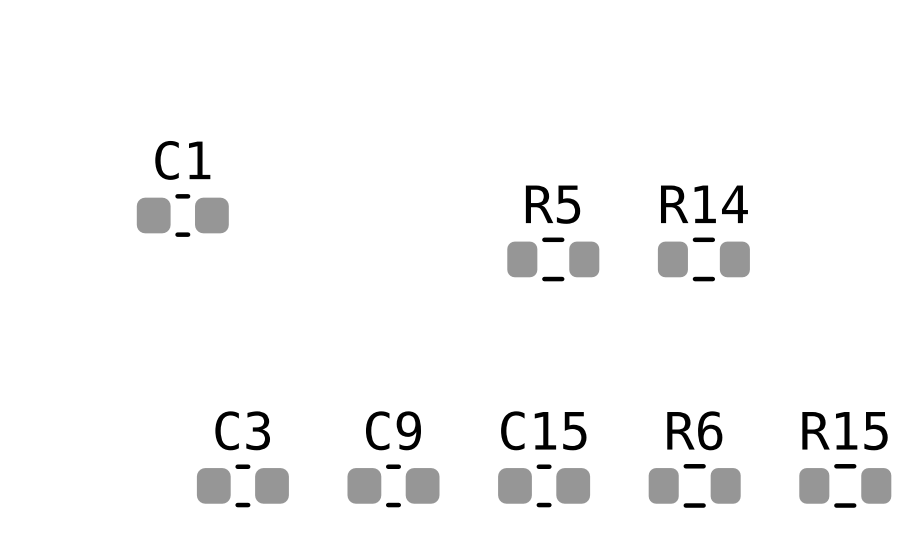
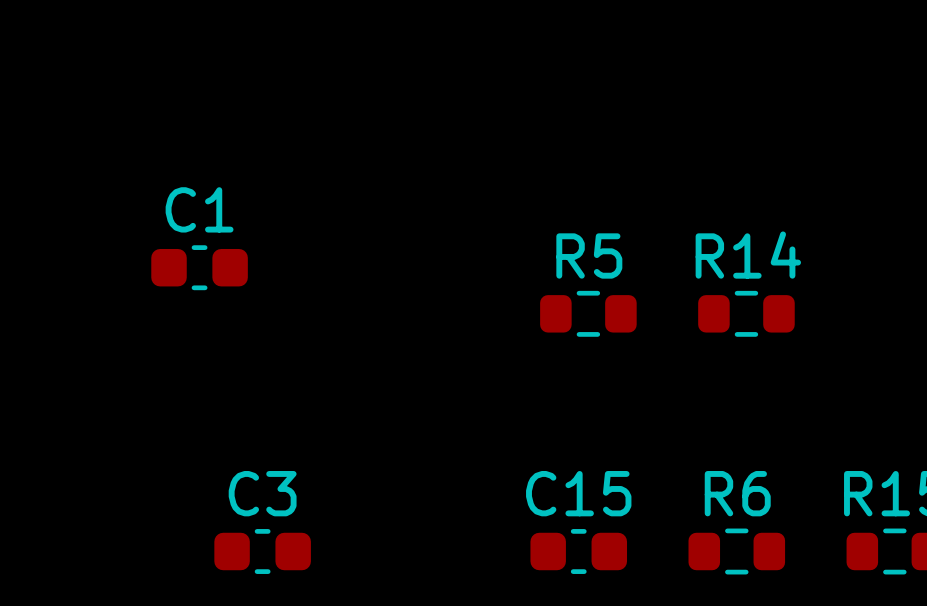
C9: (393, 485) -> none

